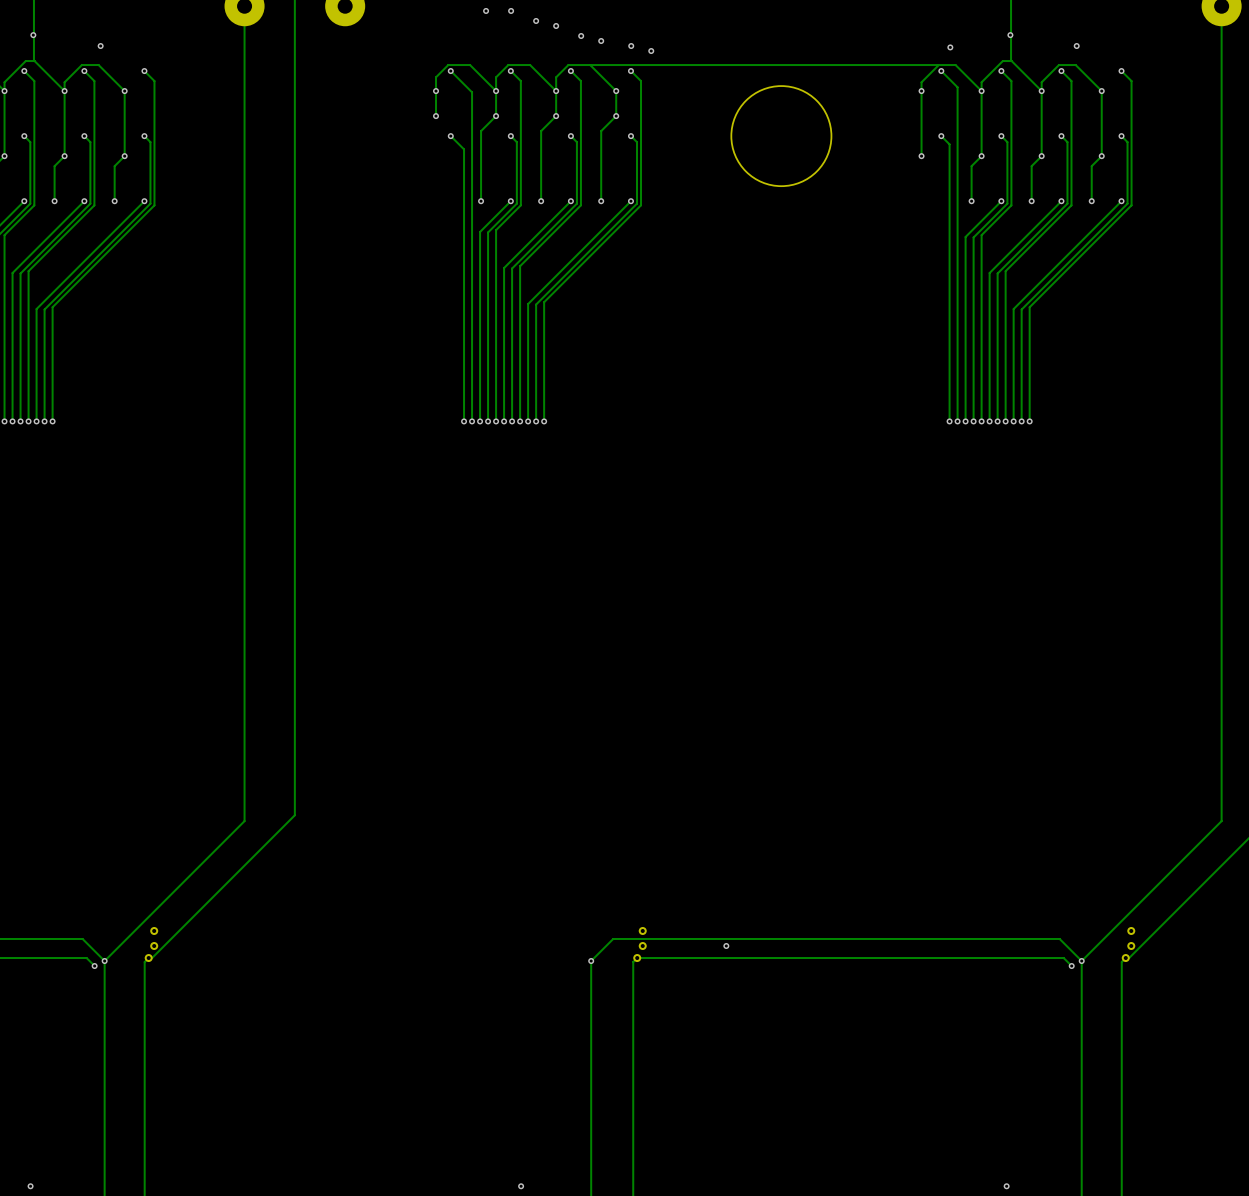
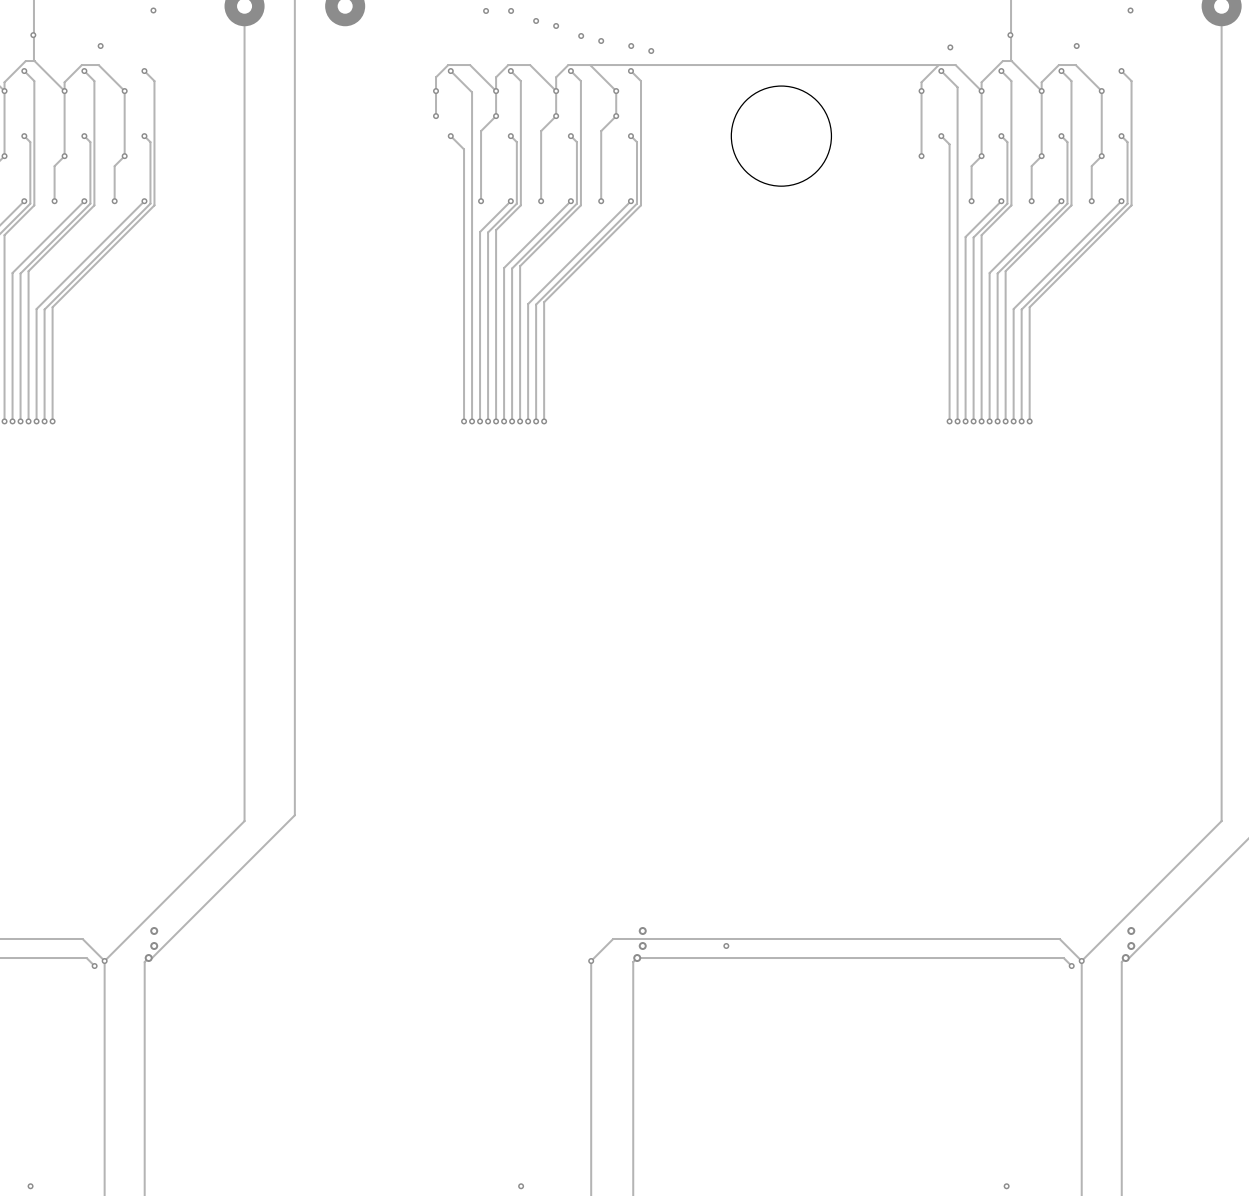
via: none -> (153, 10)
via: none -> (1130, 10)

